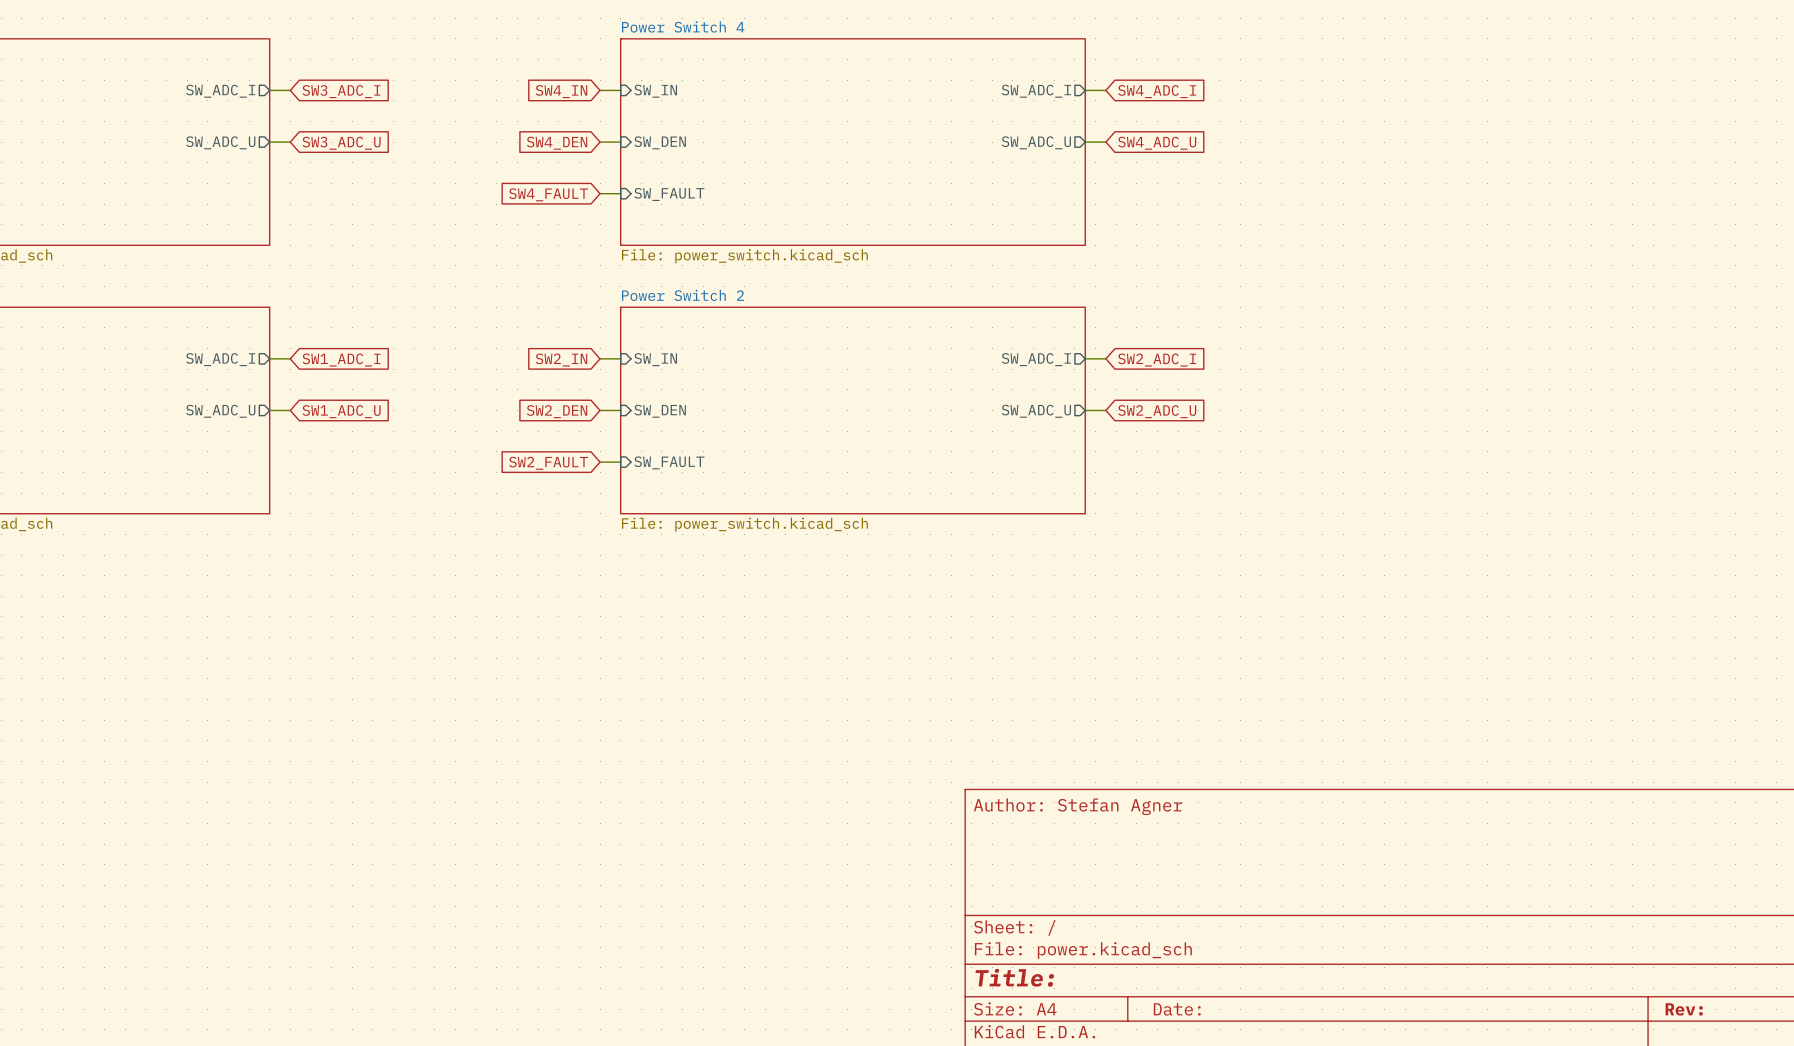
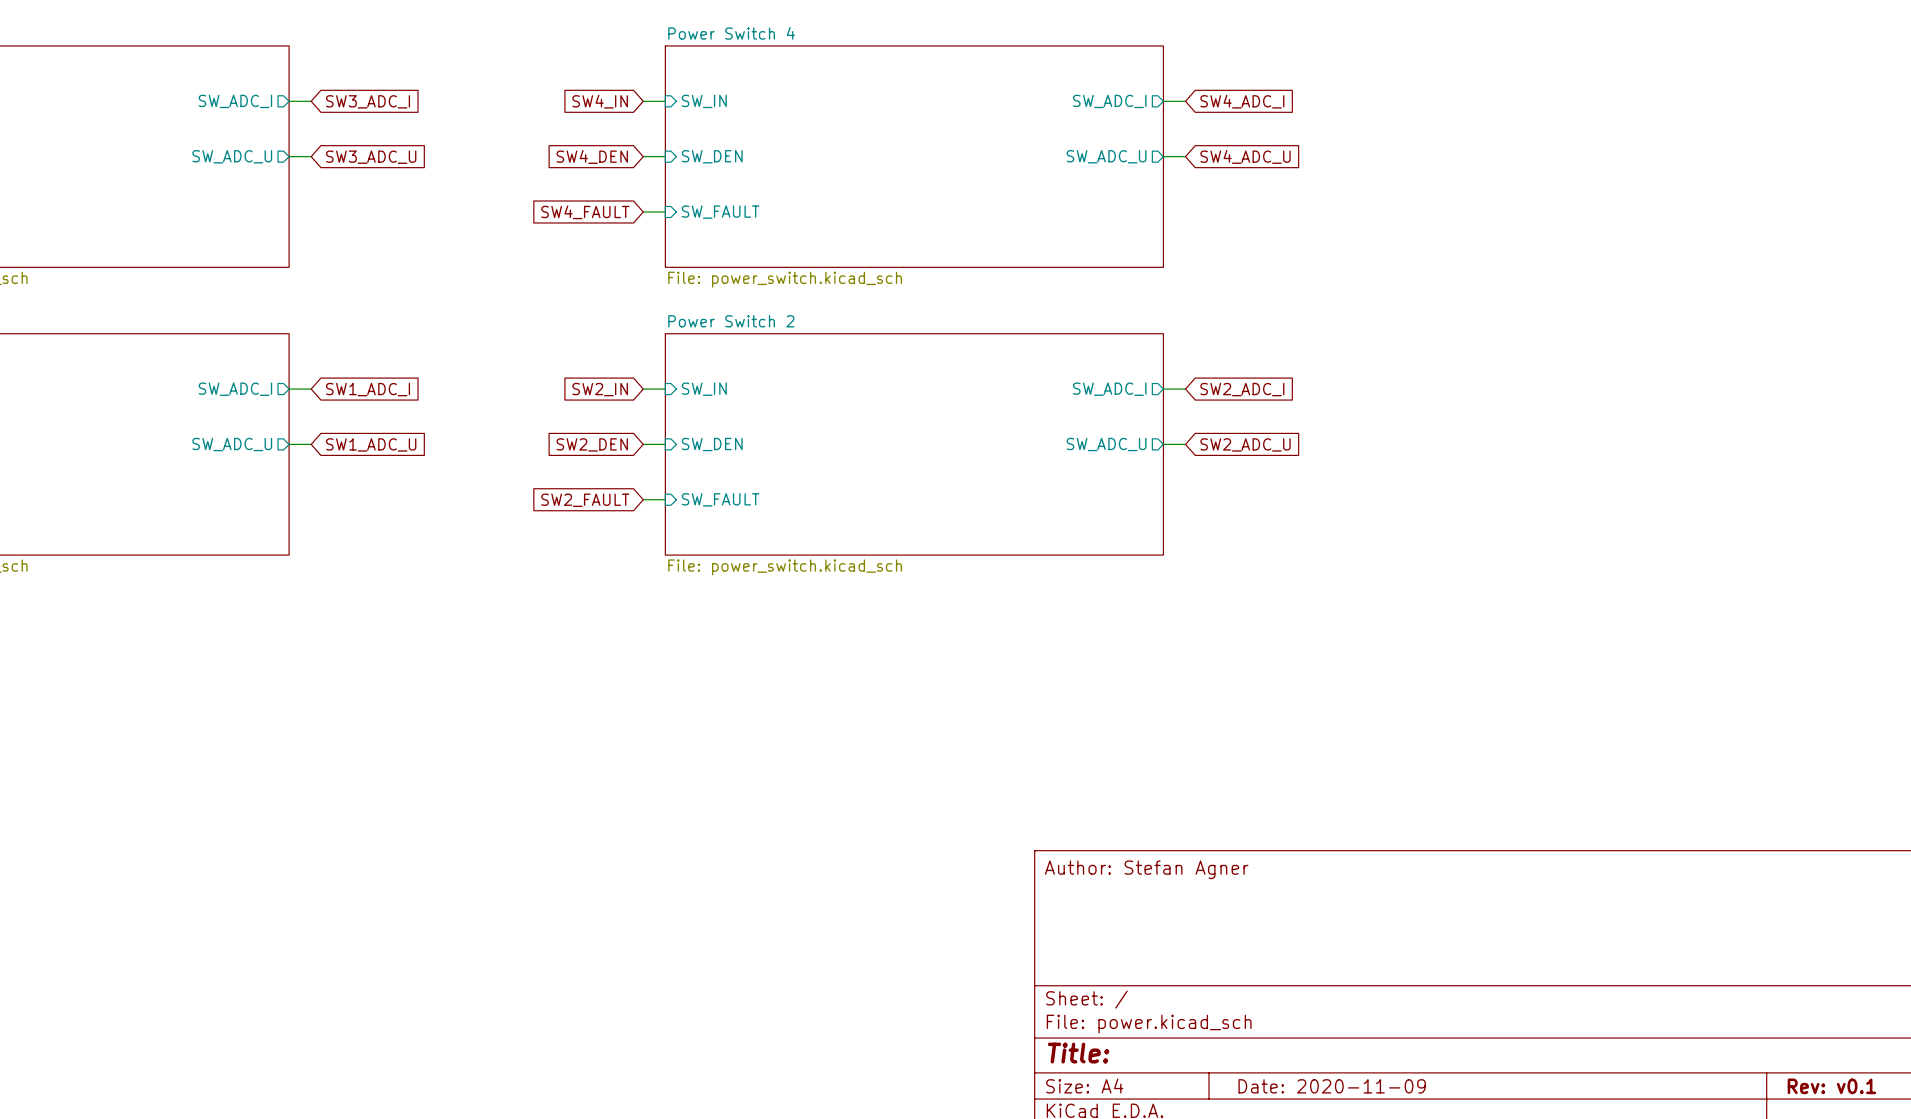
title block: Date: (1177, 1009) -> Date: 2020-11-09 (1332, 1086)
title block: Rev: (1684, 1009) -> Rev: v0.1 (1831, 1086)

